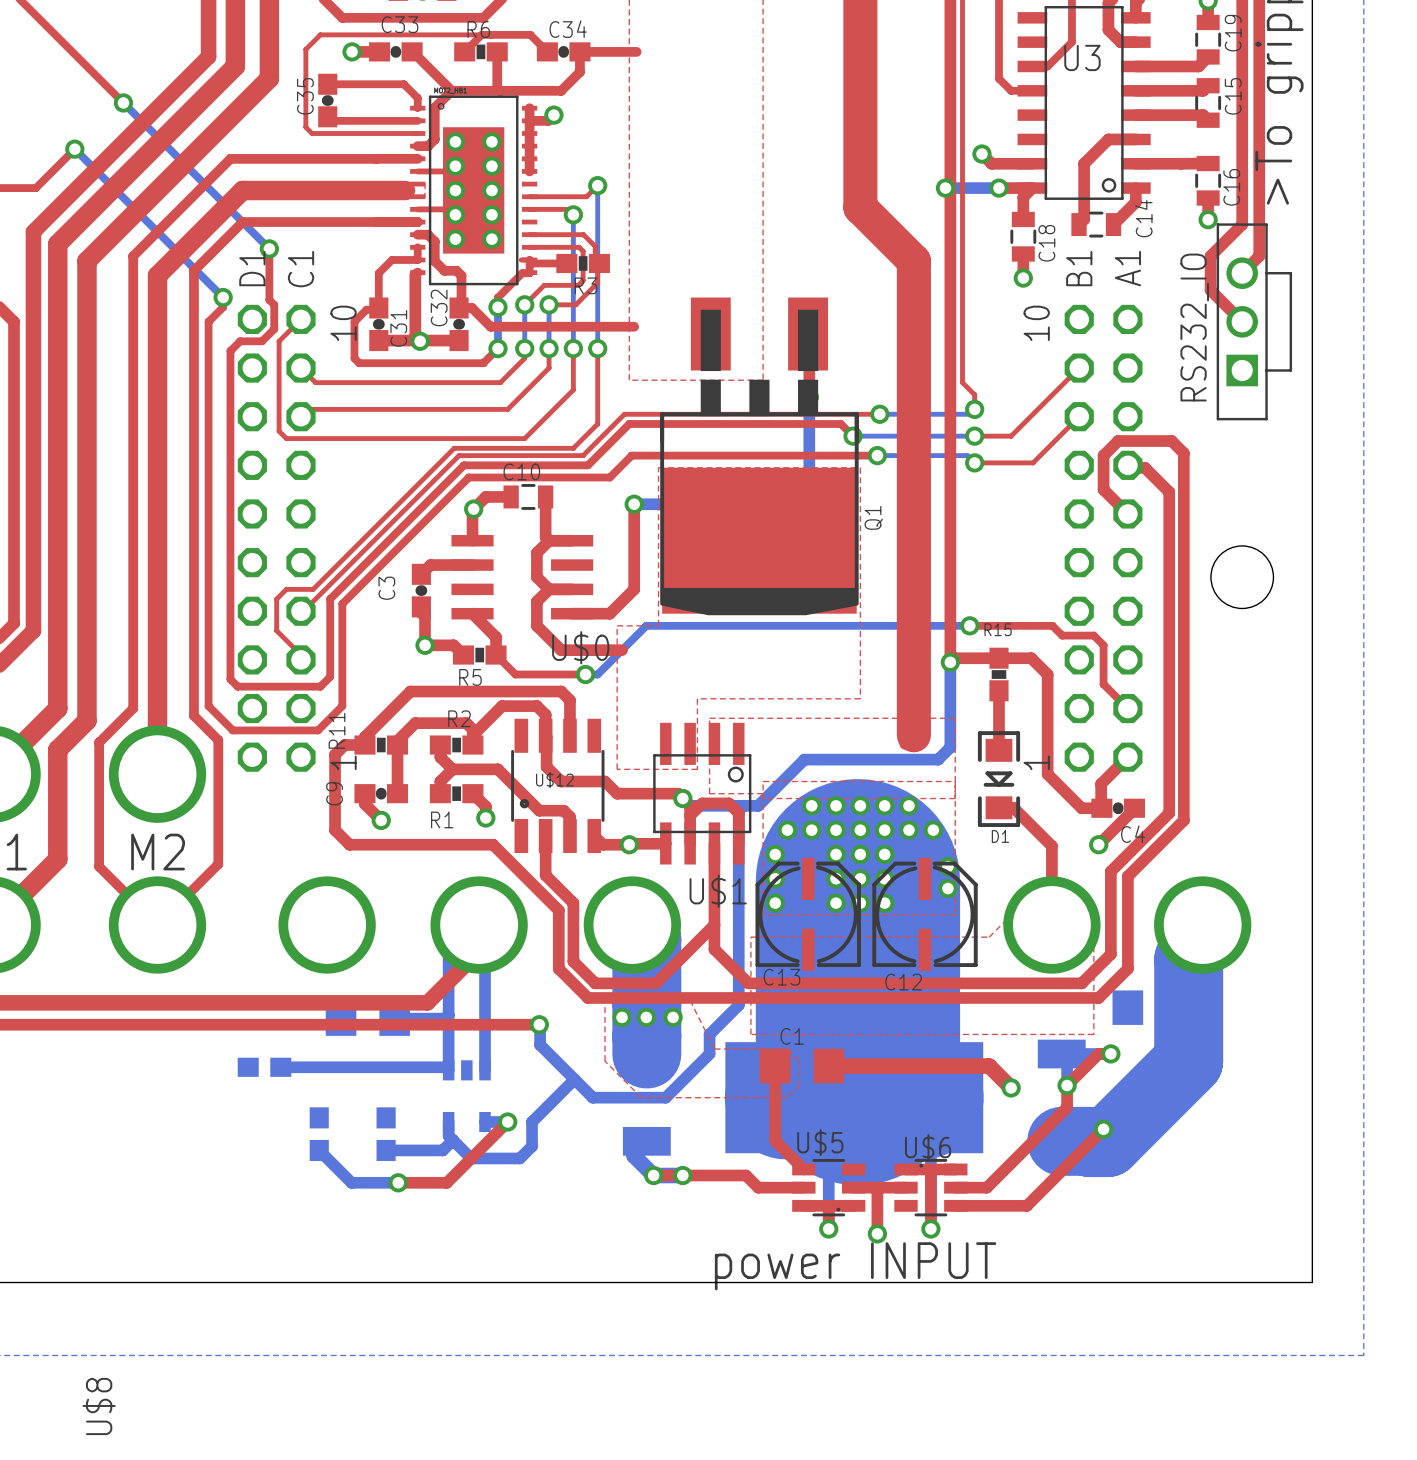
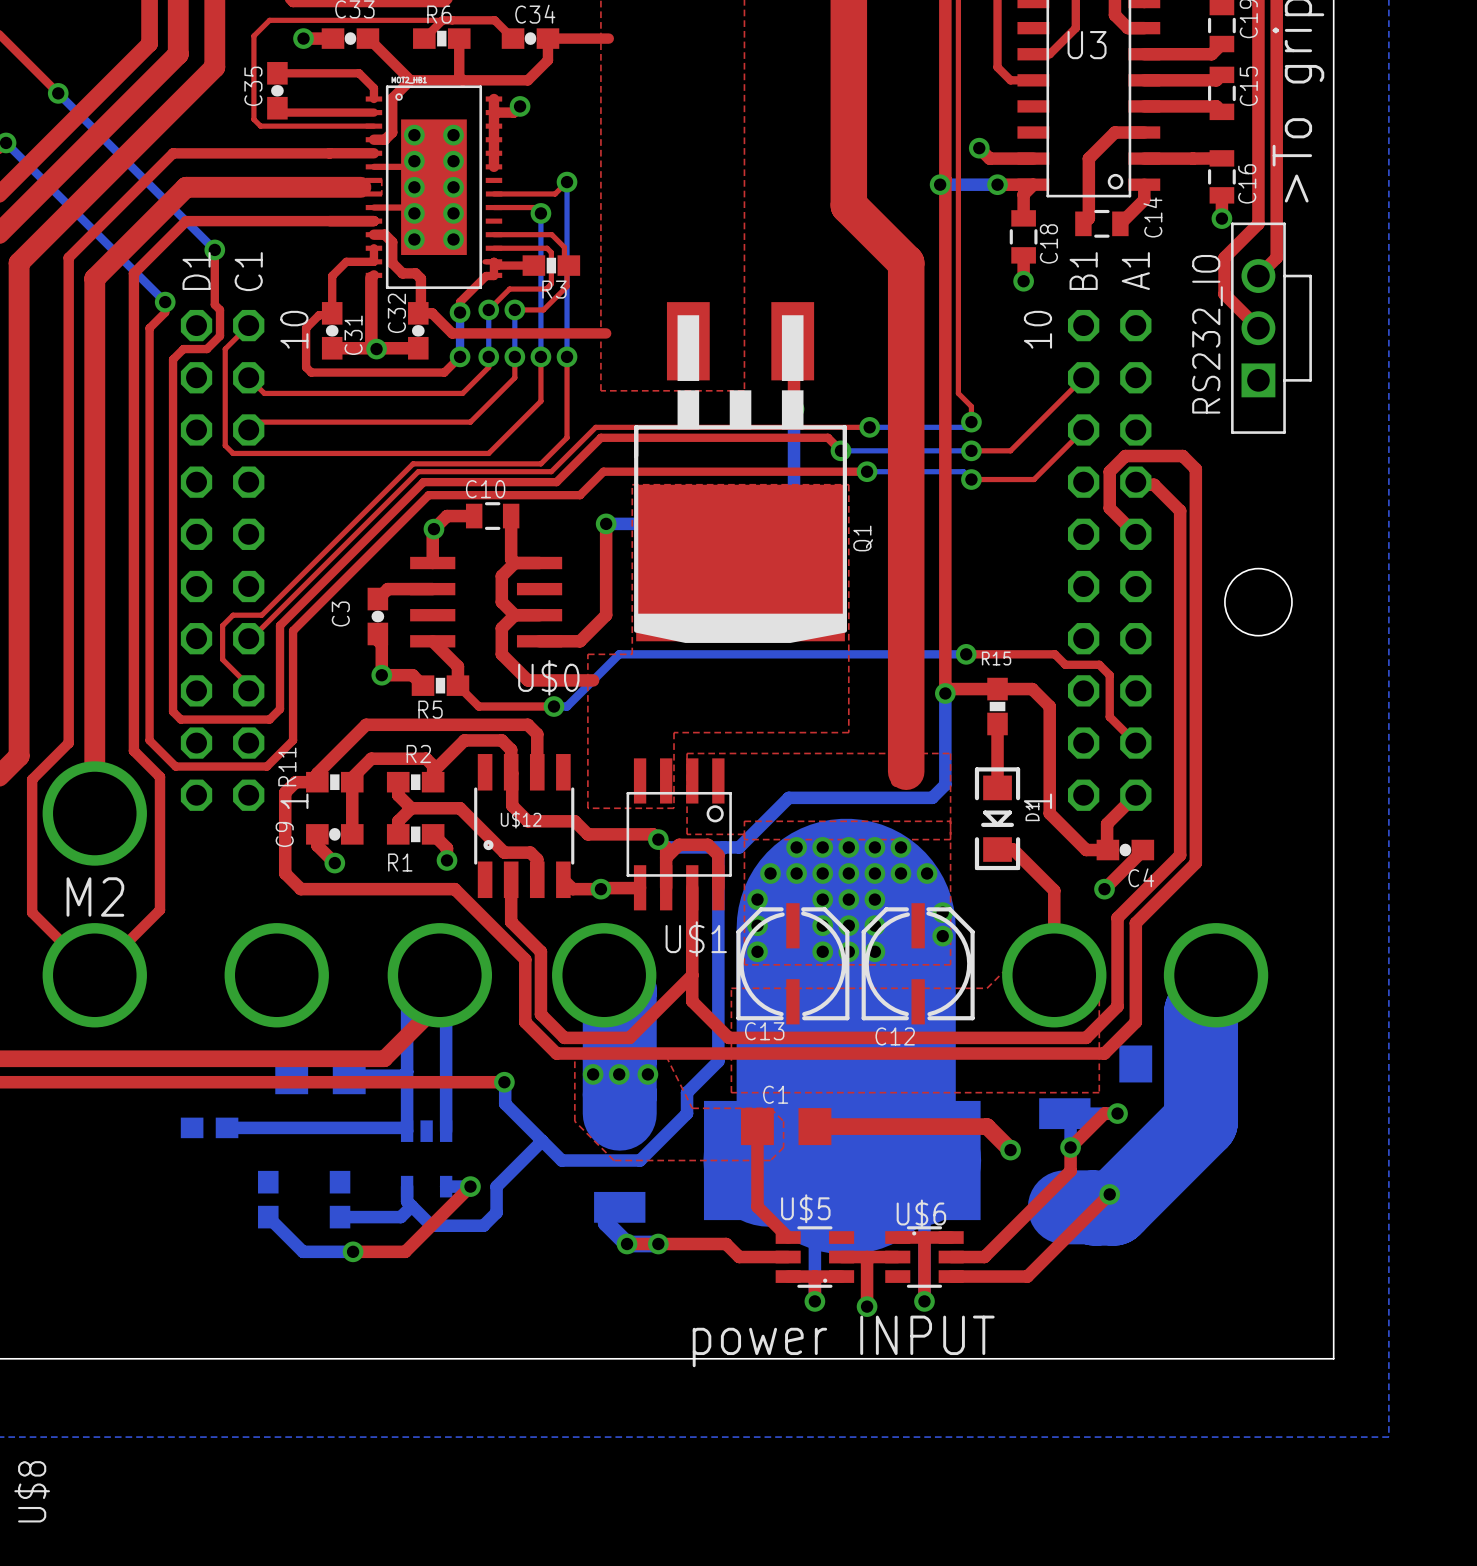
D1 name rotation: 0° (1000, 836) -> 90° counterclockwise (1032, 811)
D1 name position: D1 (1000, 836) -> D1 (1032, 811)

